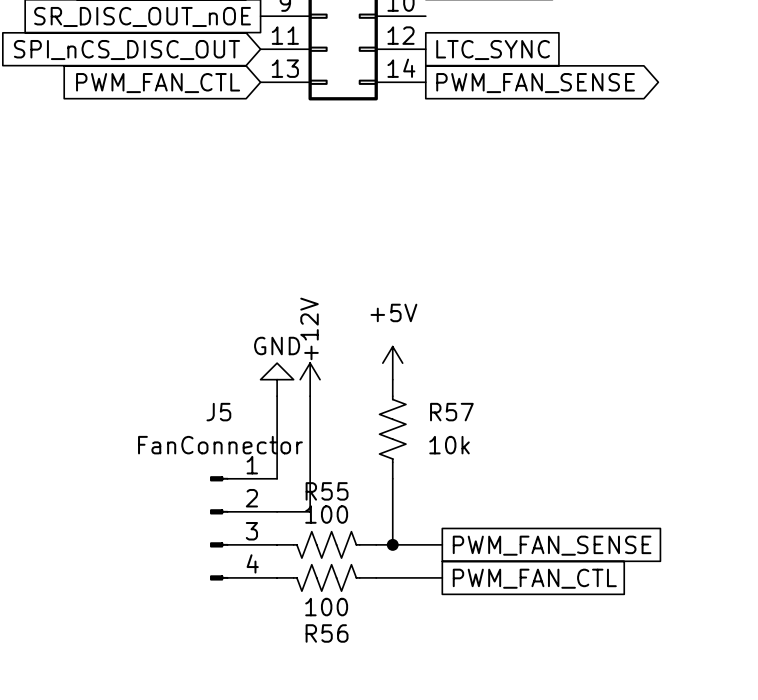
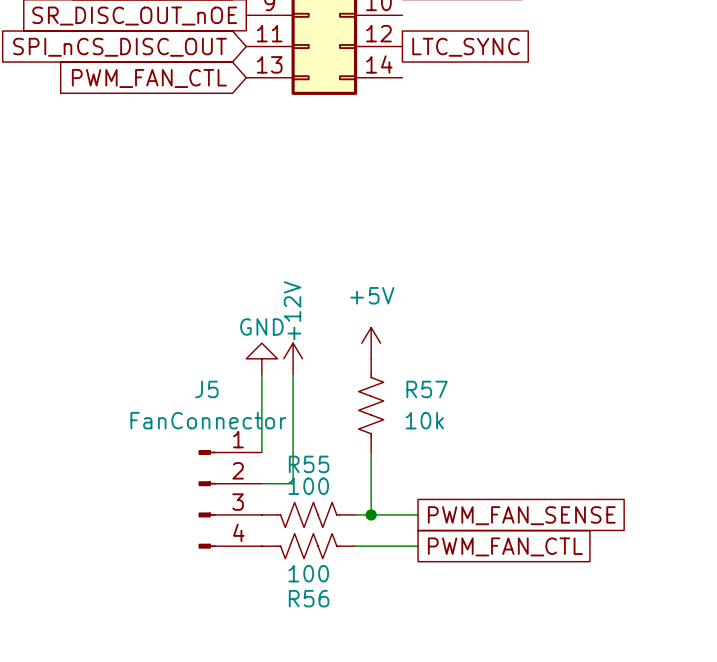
global label: PWM_FAN_SENSE (535, 83) -> none

